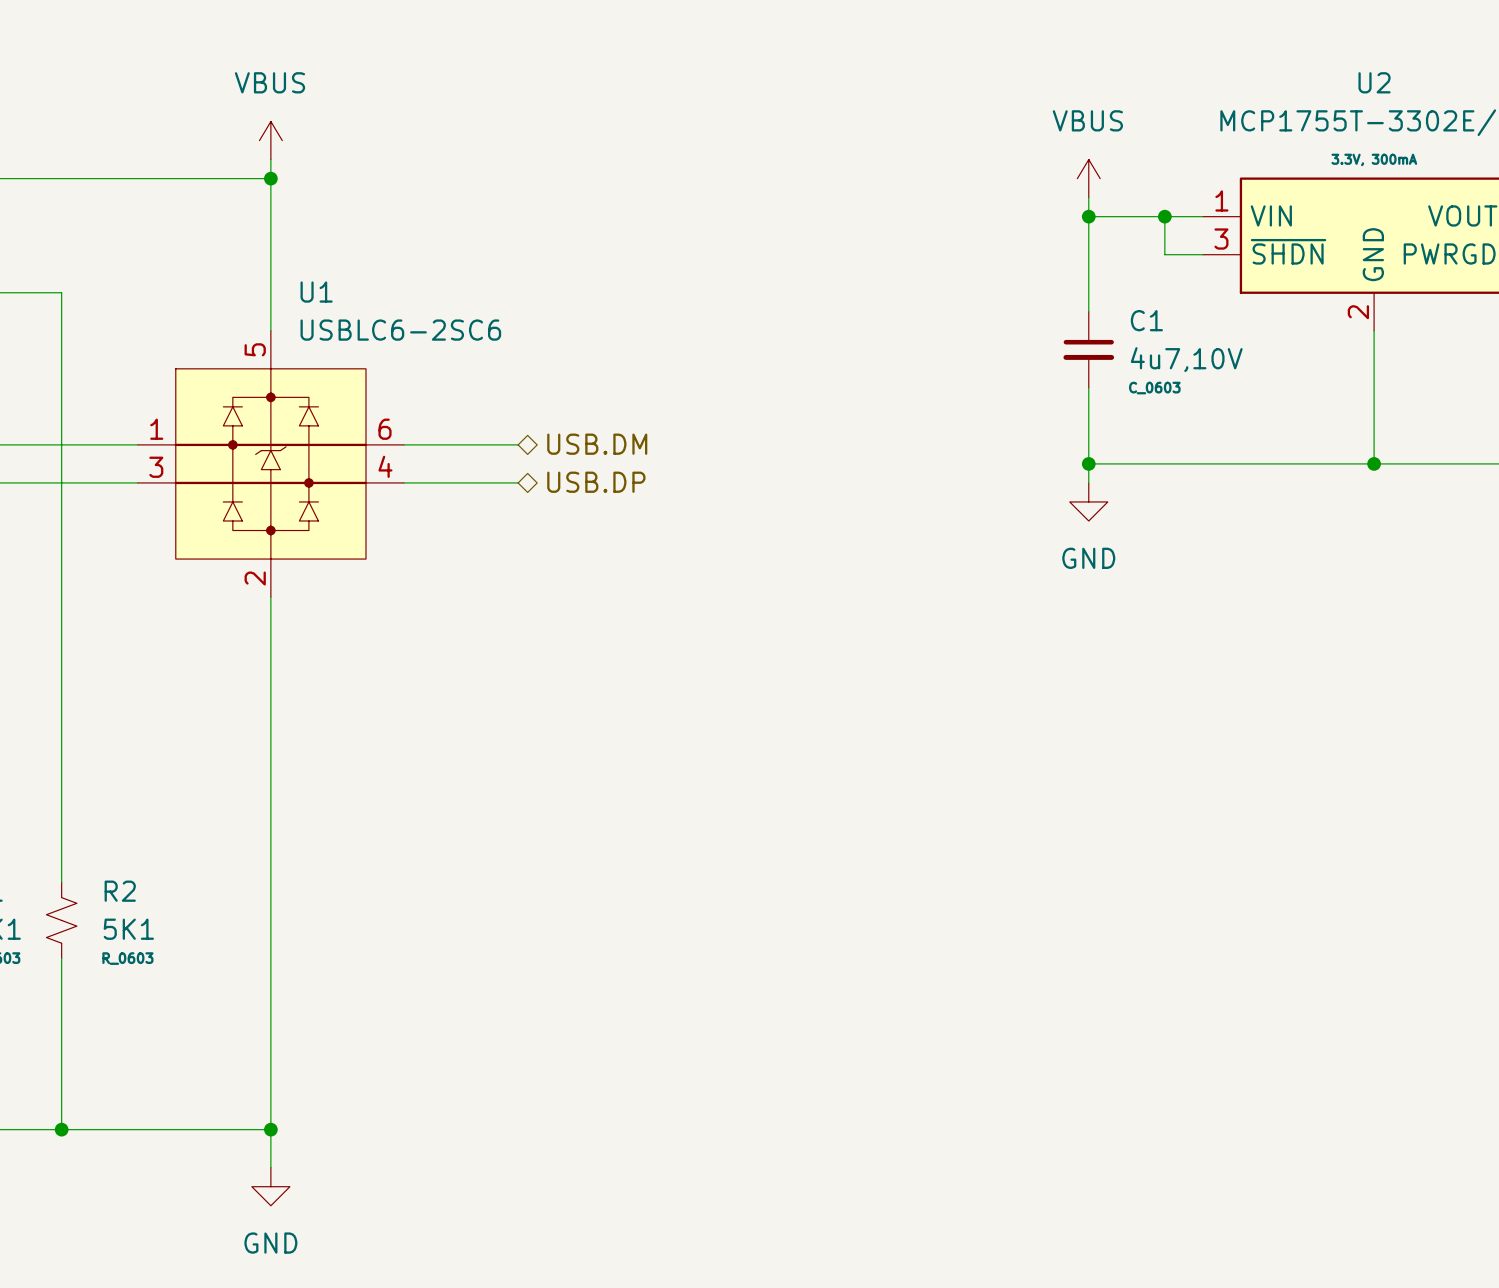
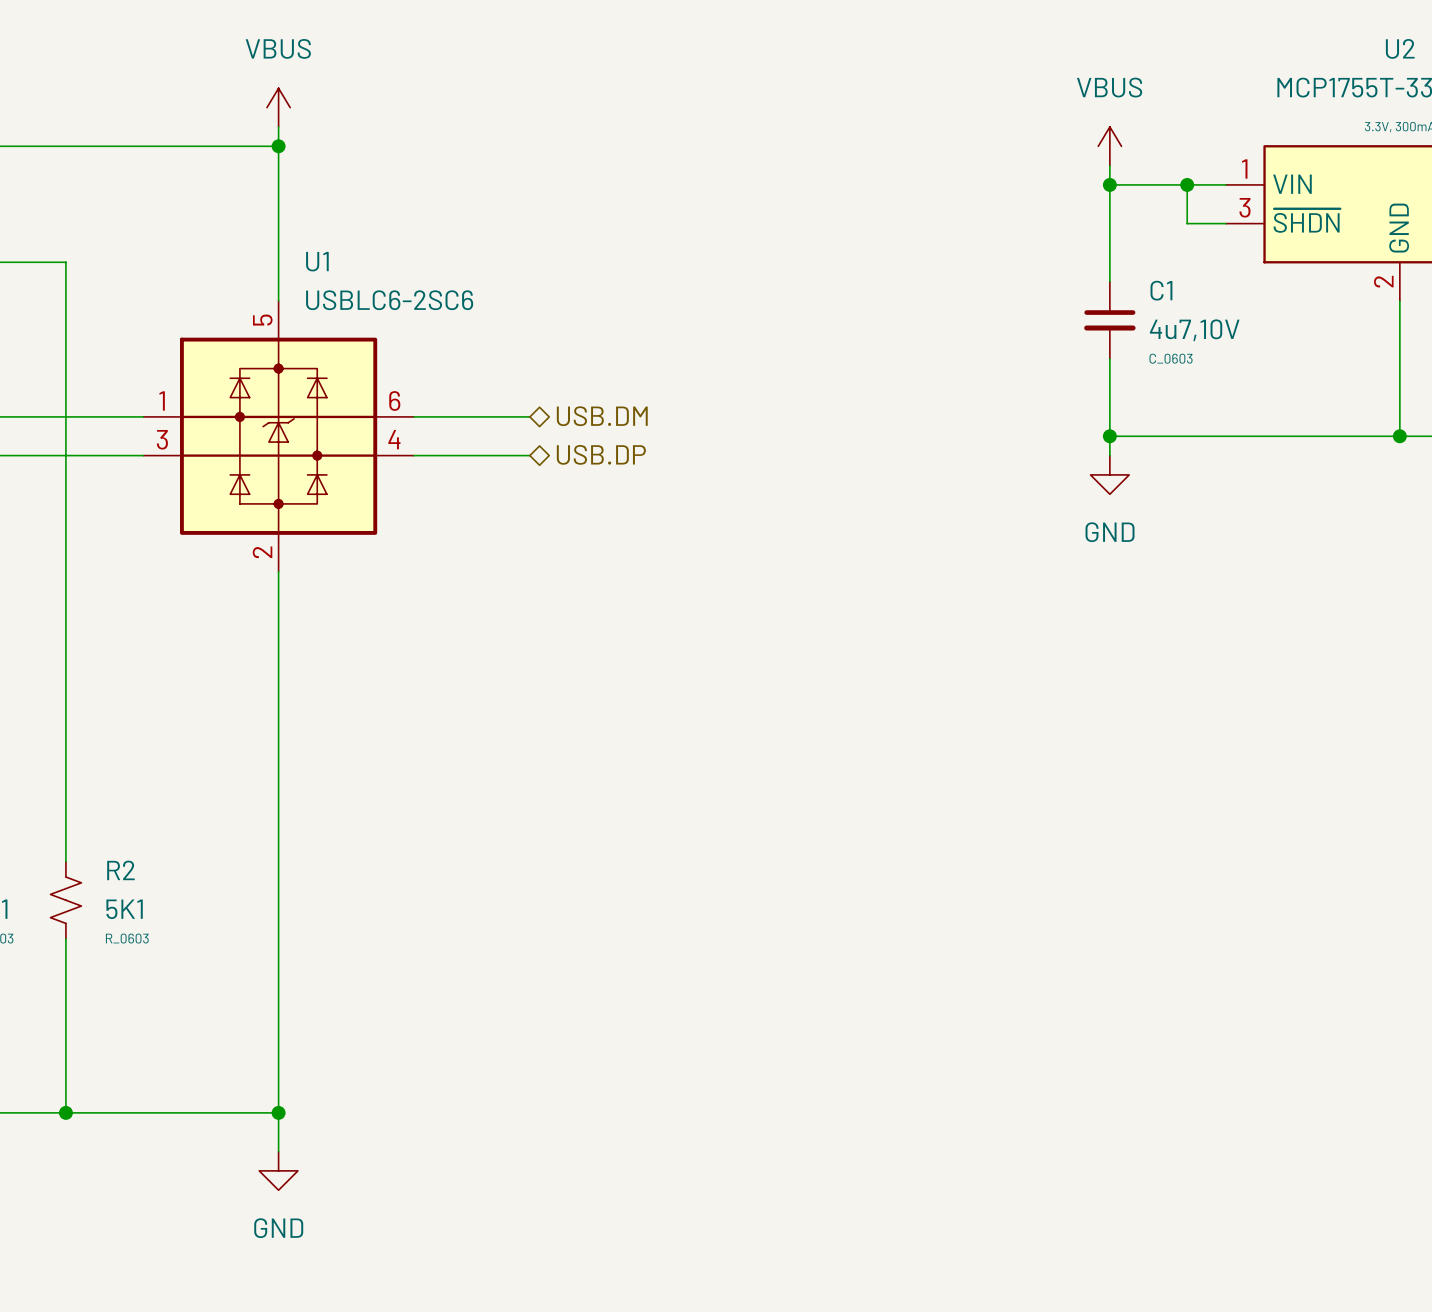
U1 symbol: [137, 330, 405, 598] -> [143, 300, 414, 572]

